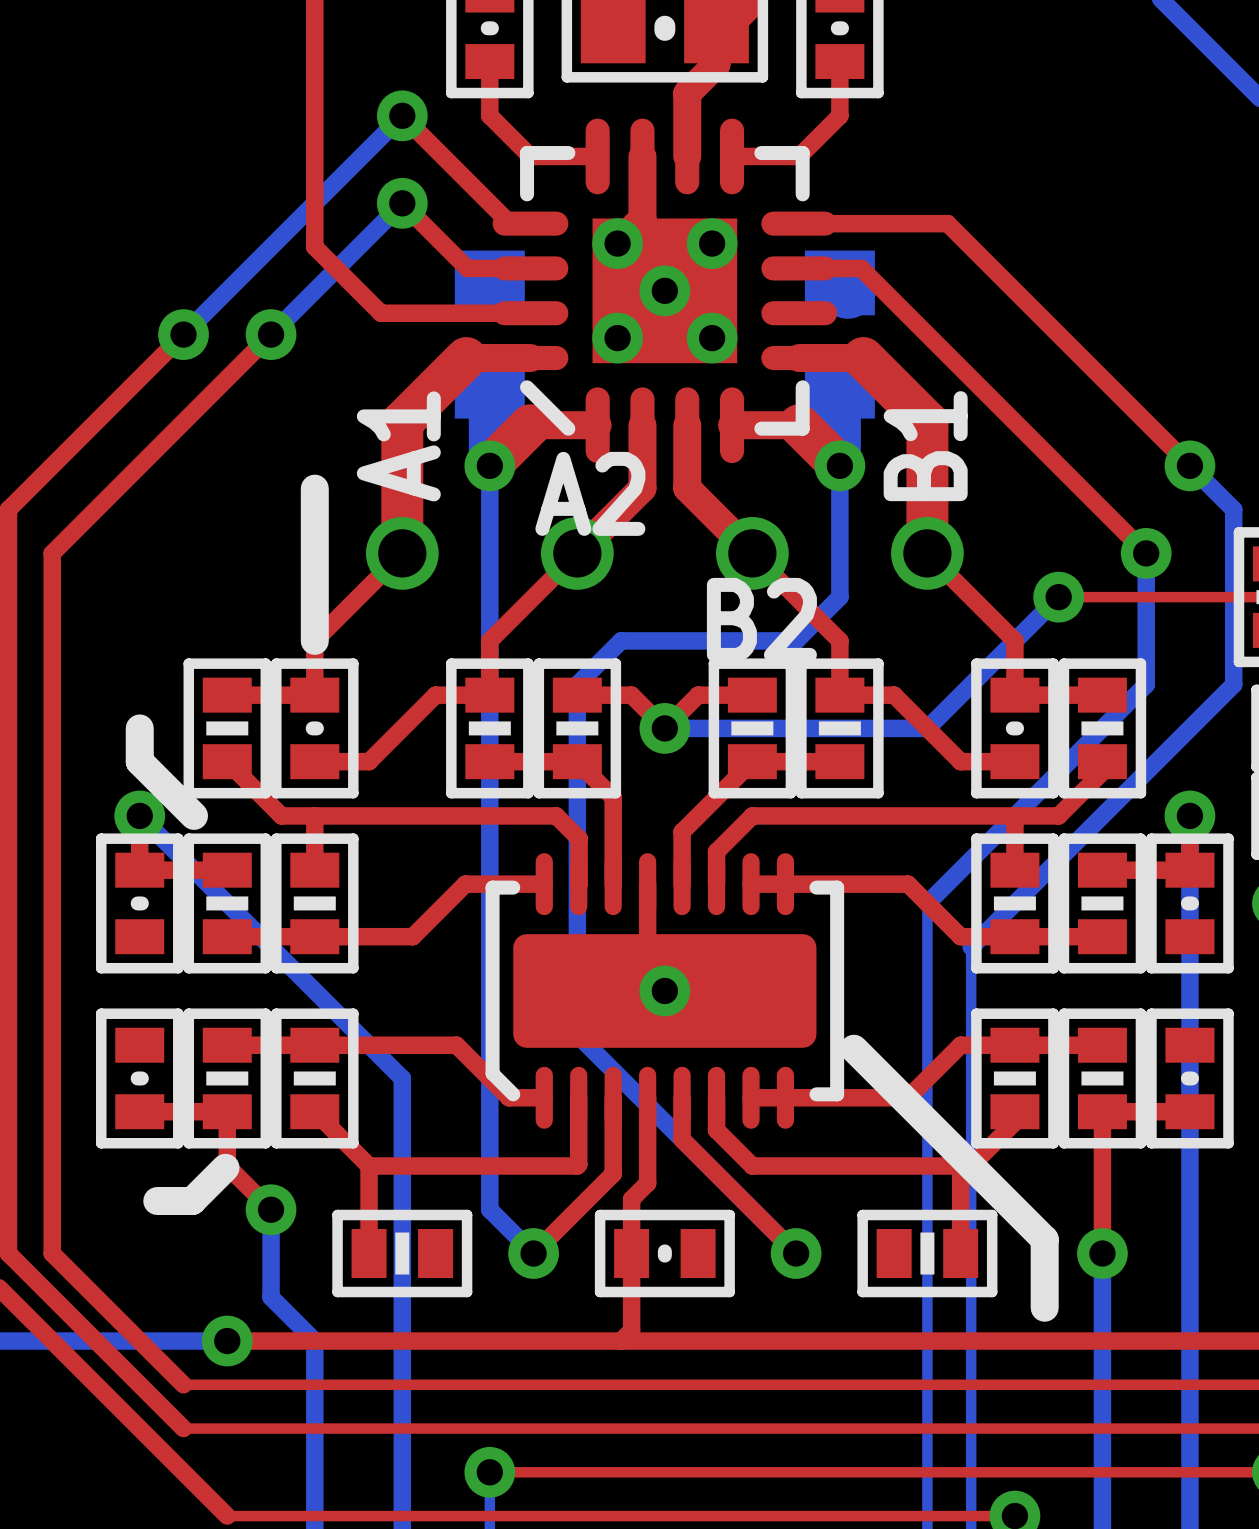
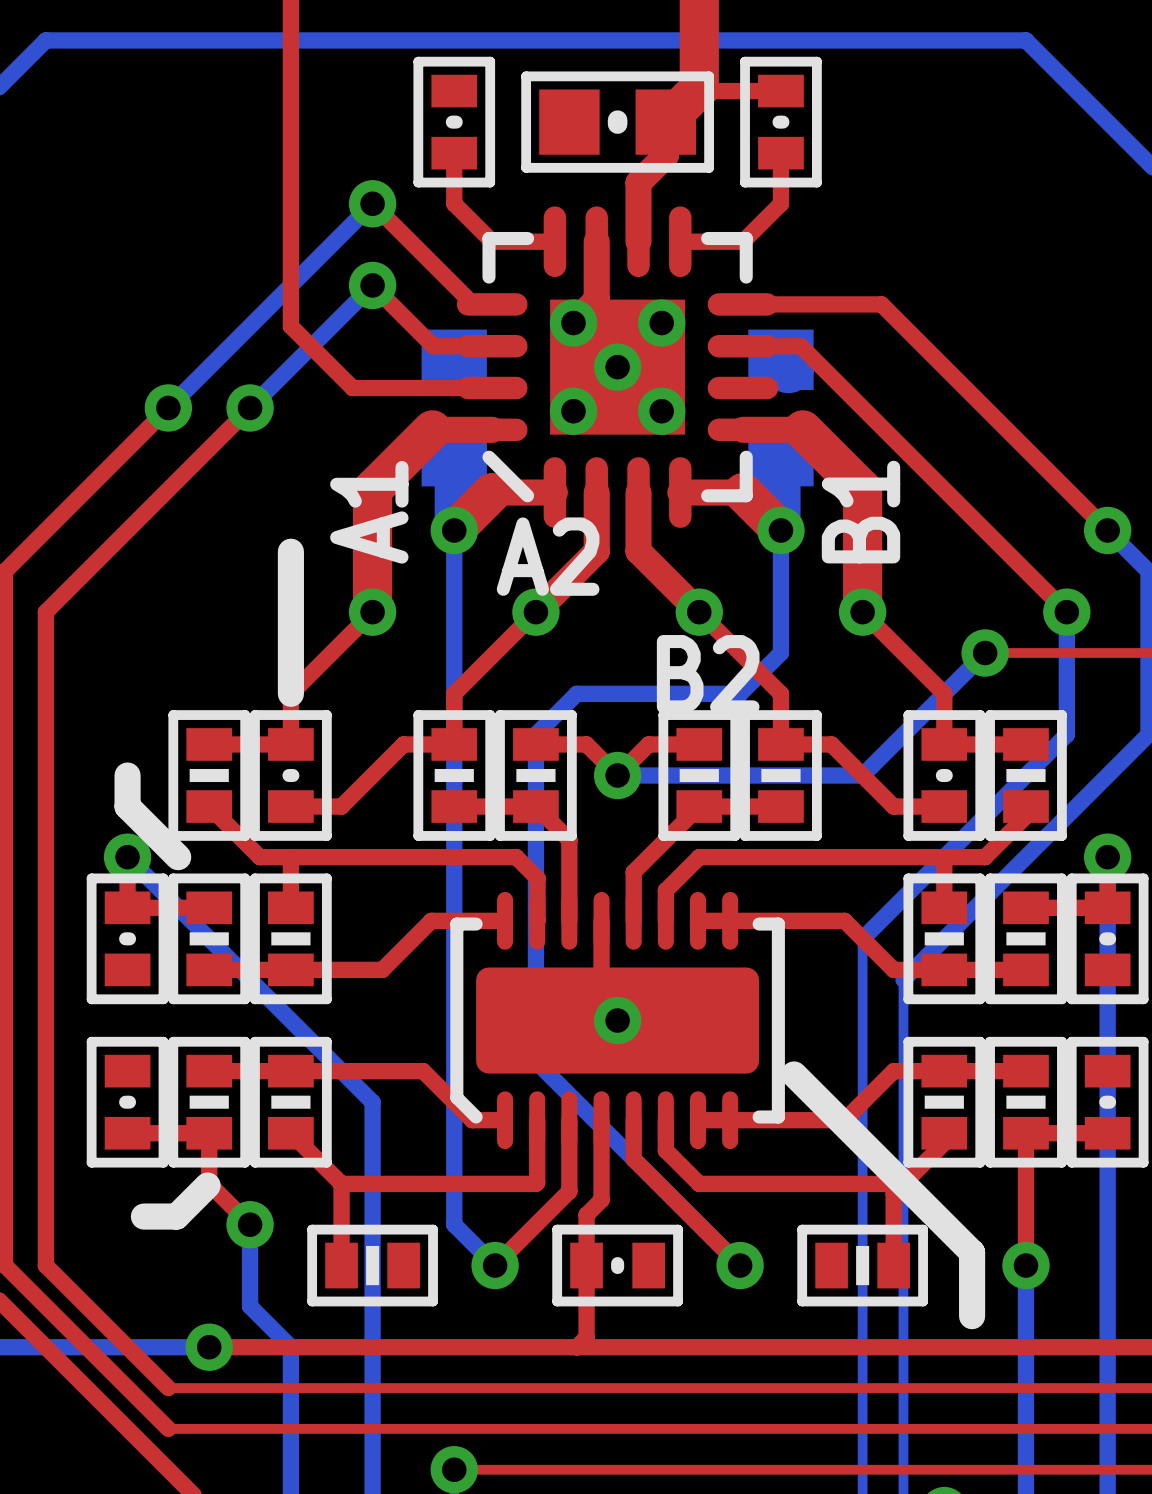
via size: [365, 517, 439, 590] -> [348, 588, 397, 636]
via size: [540, 517, 614, 590] -> [512, 588, 560, 636]
via size: [716, 517, 789, 590] -> [675, 588, 723, 636]
via size: [891, 517, 964, 590] -> [838, 588, 887, 636]

